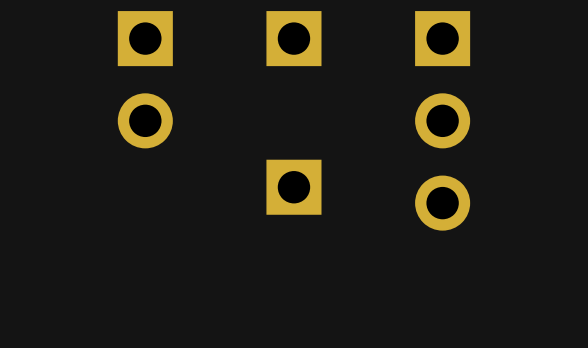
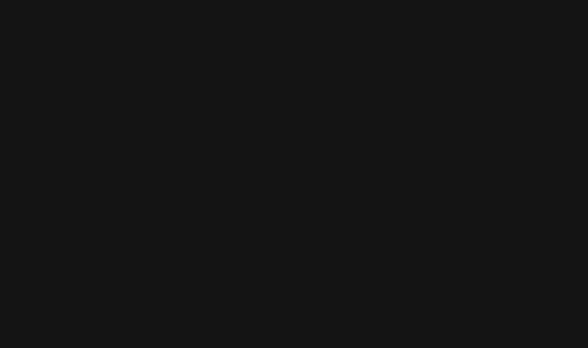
part: (293, 38) -> none
part: (145, 79) -> none
part: (442, 120) -> none
part: (293, 187) -> none

